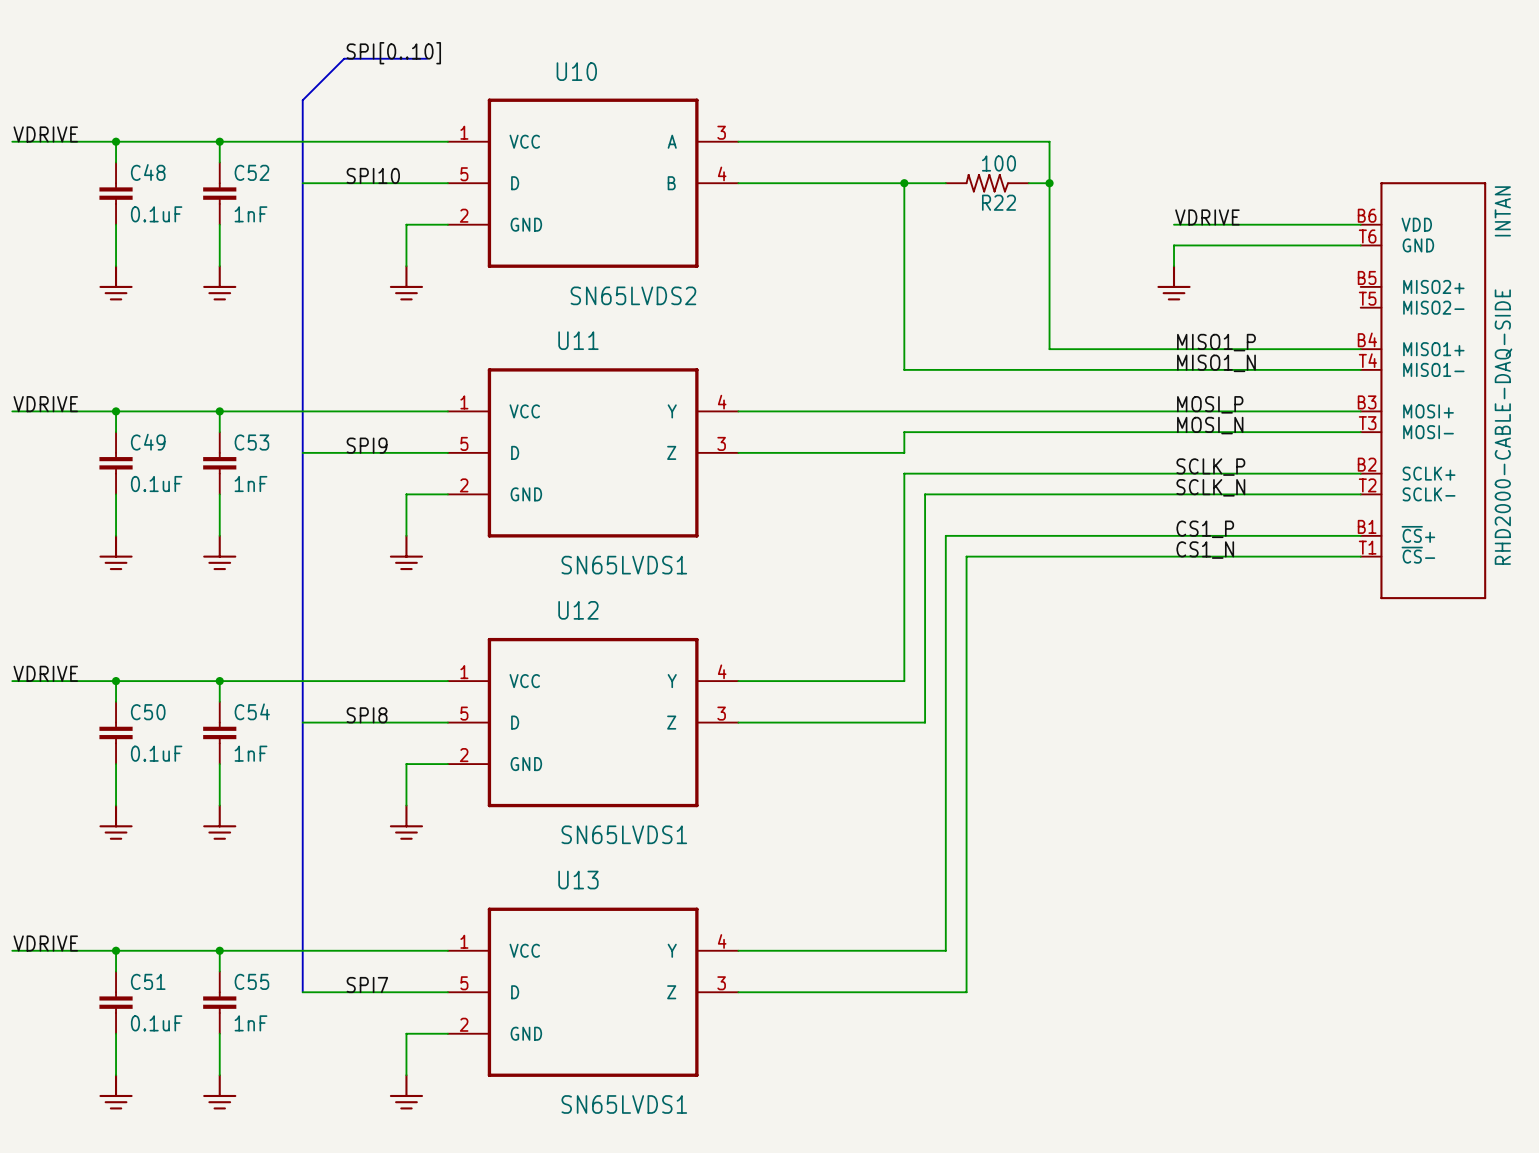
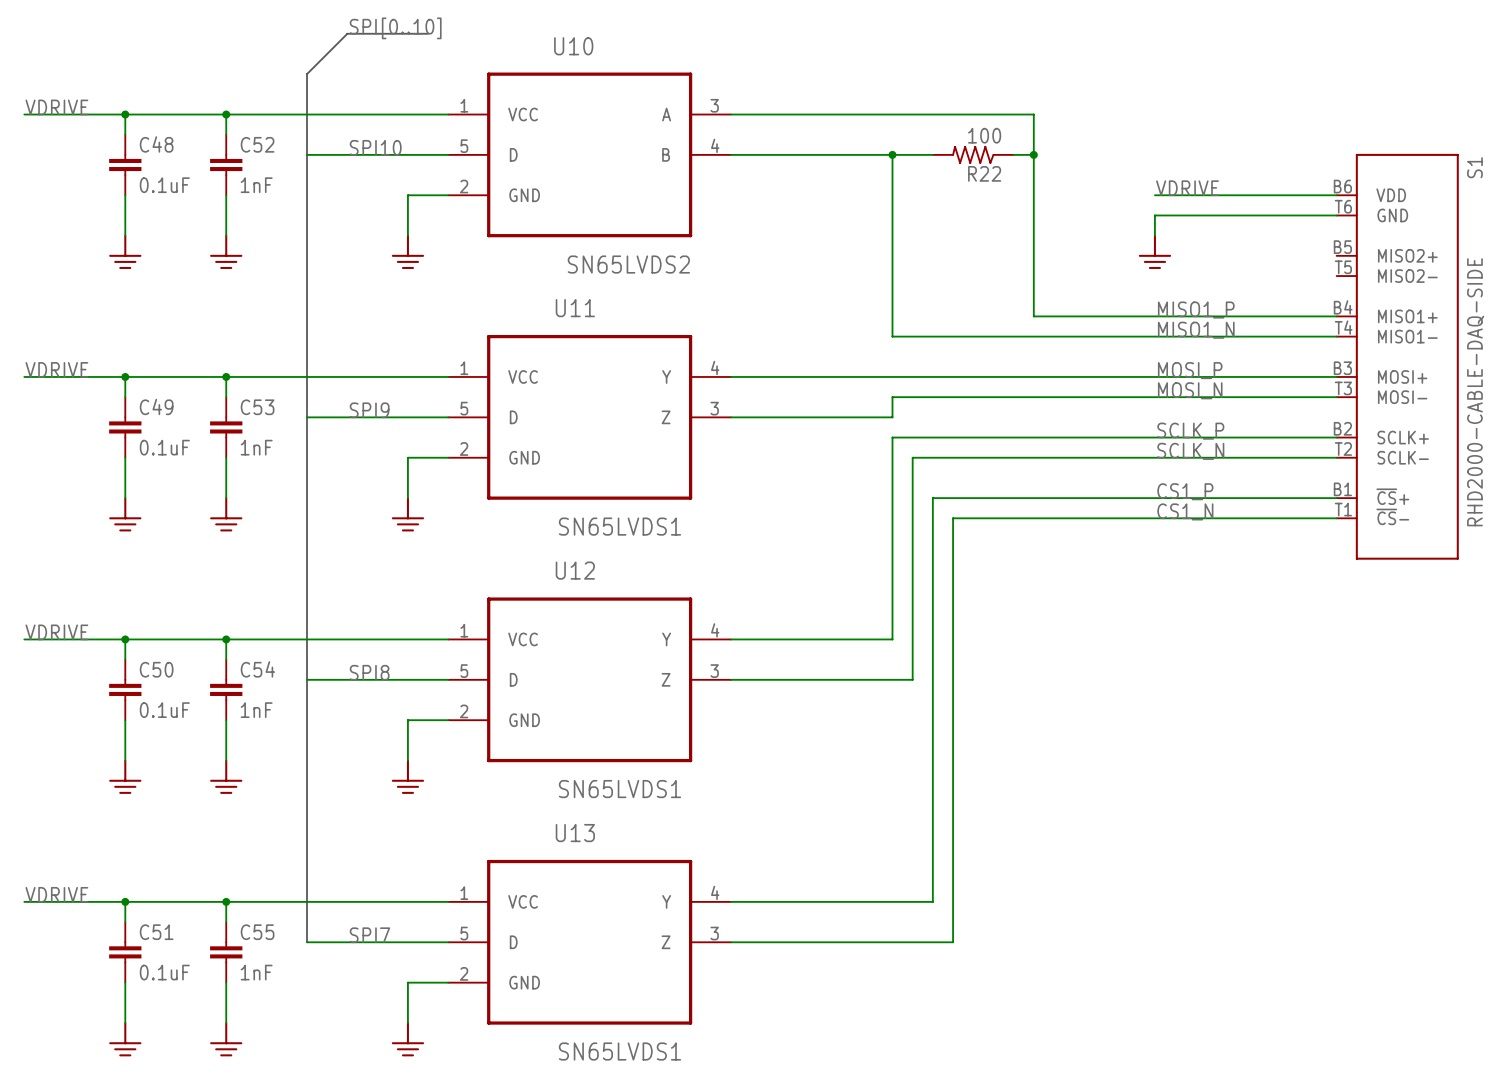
INTAN name: INTAN (1502, 211) -> S1 (1474, 167)

